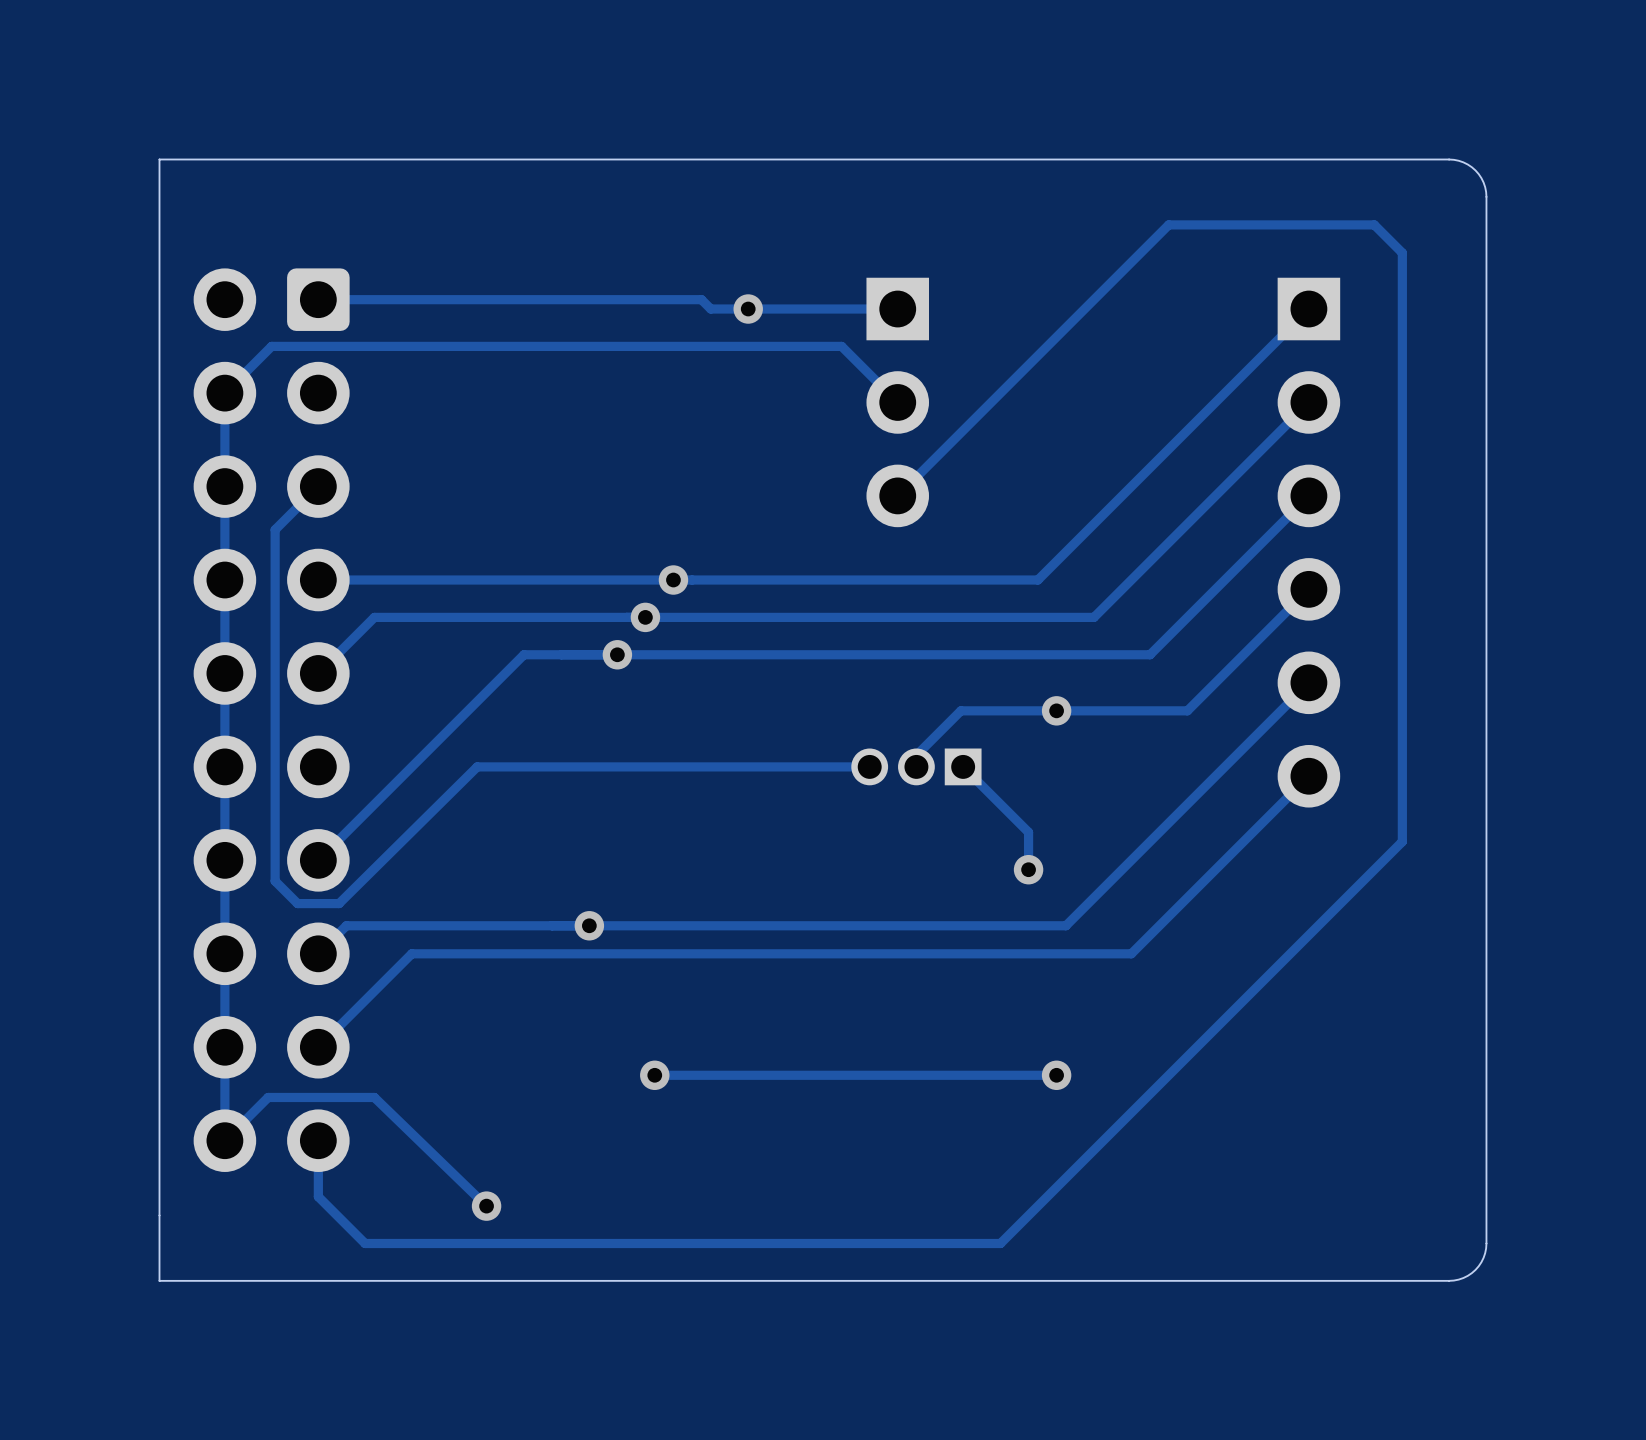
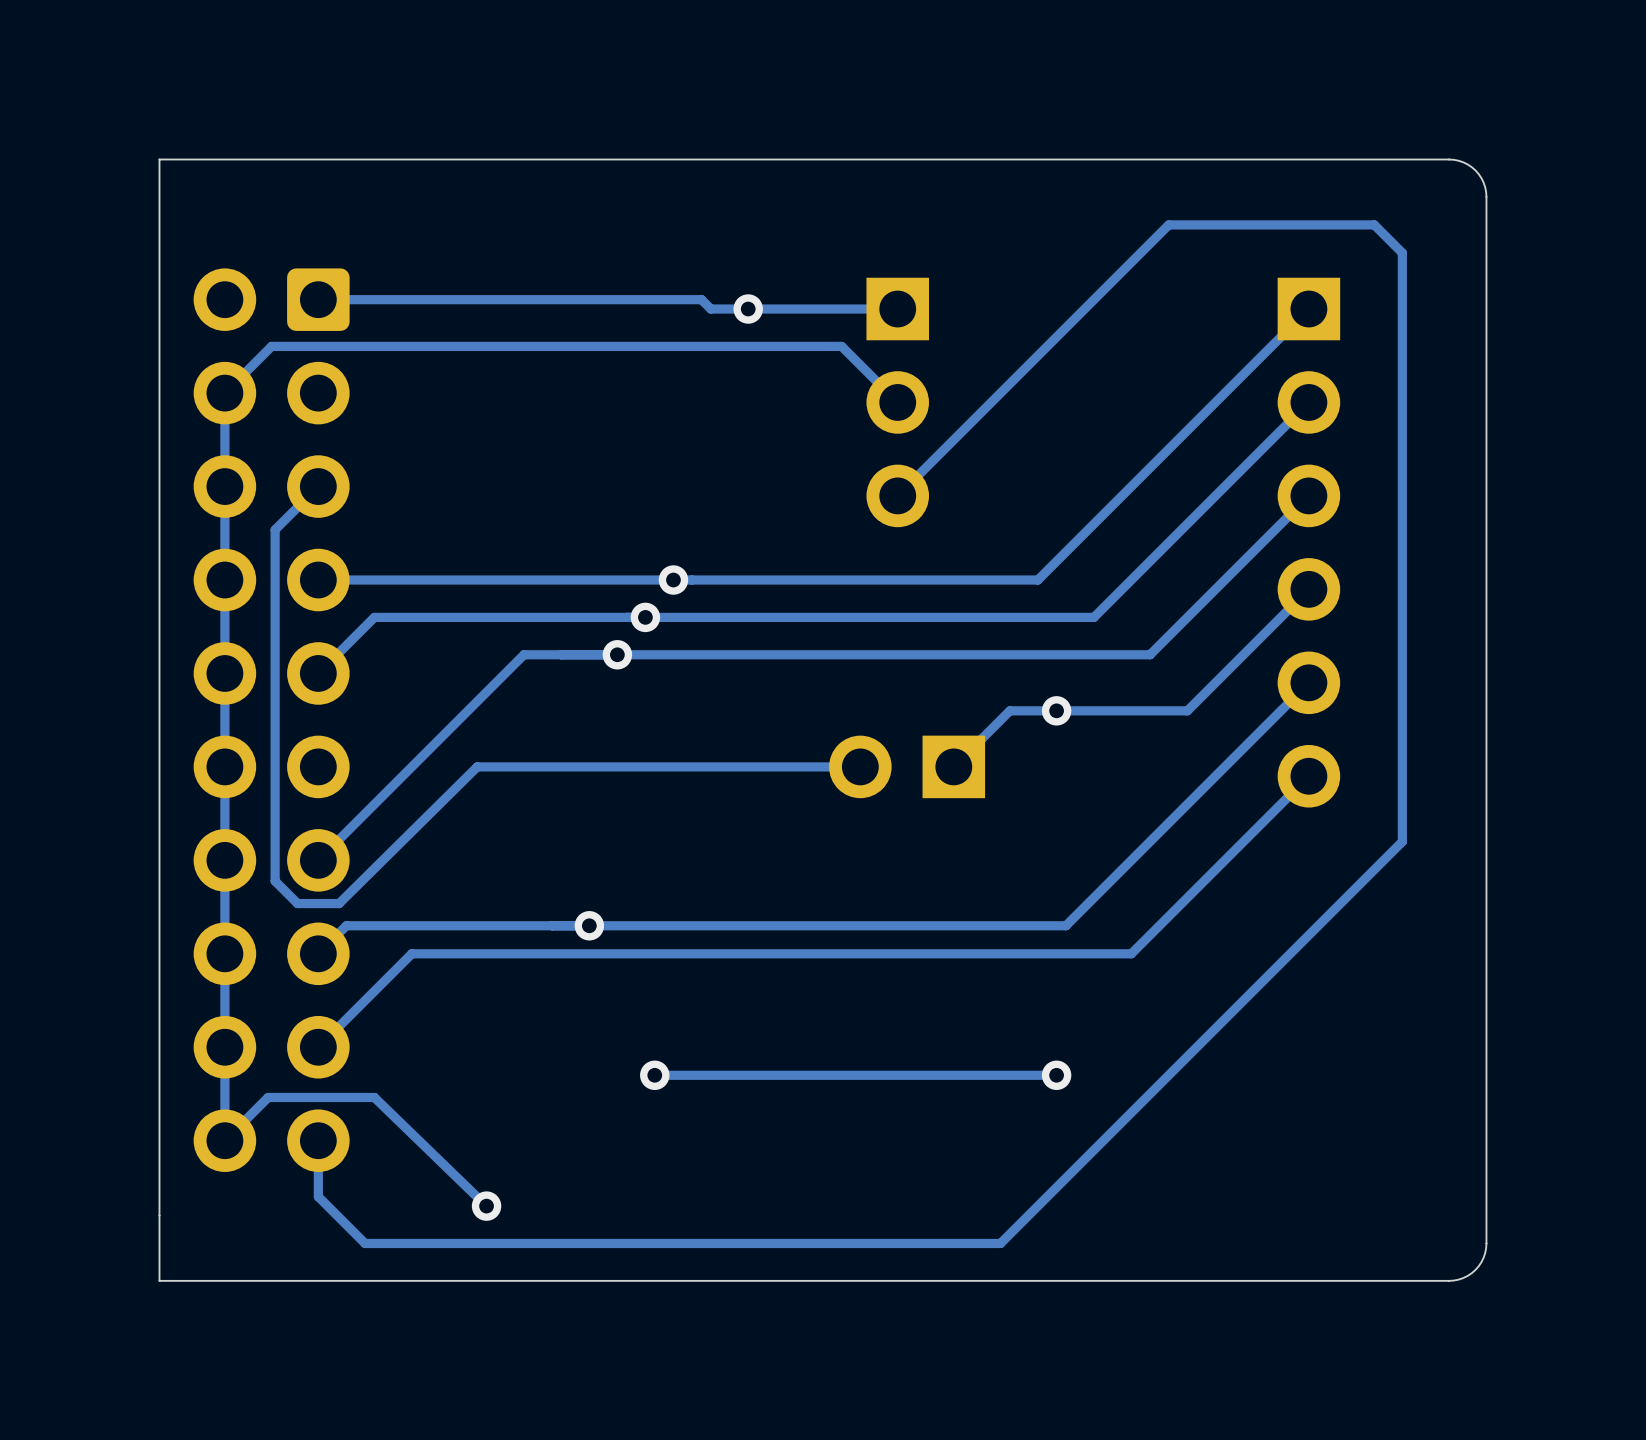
track: (1009, 710) (960, 710) (916, 755) (916, 766) -> (1009, 710) (953, 766)
part footprint: [851, 748, 982, 786] -> [829, 735, 986, 799]
track: (963, 766) (1028, 832) (1028, 869) -> none
via: (1028, 869) -> none

